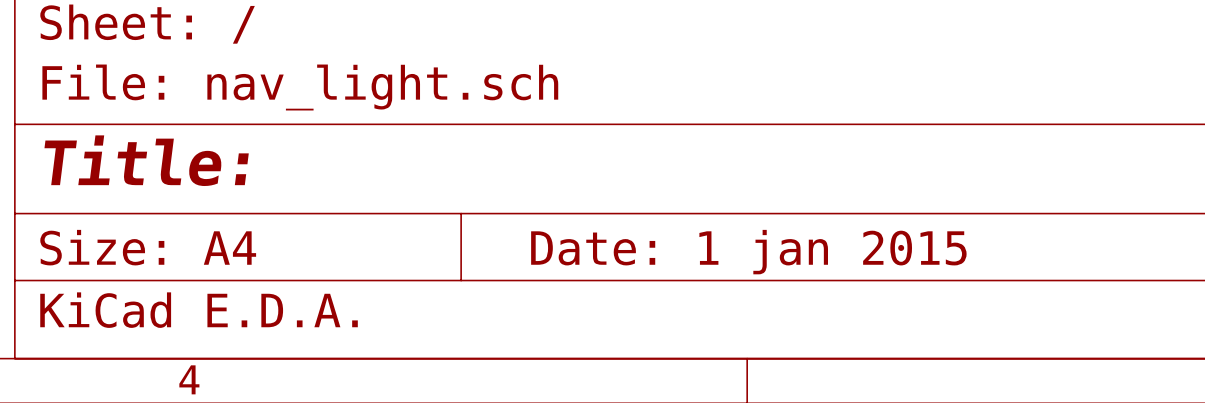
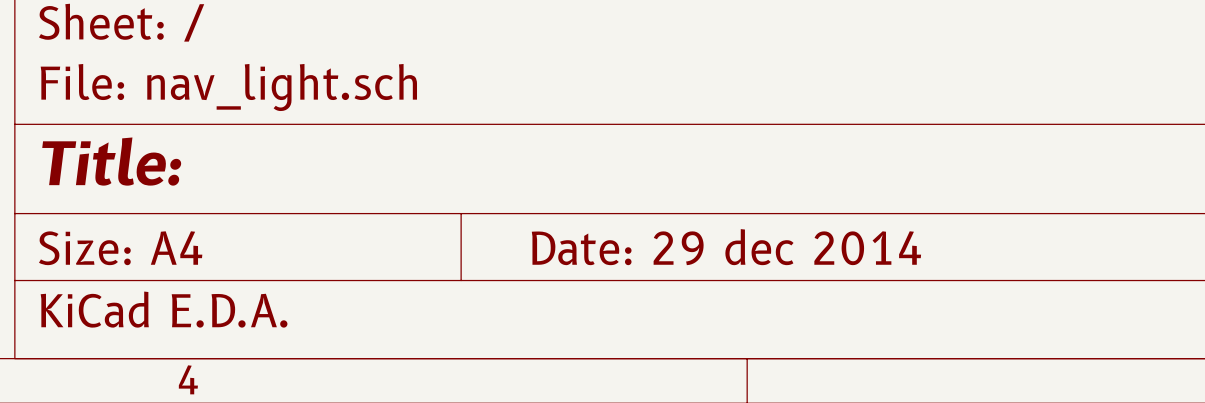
title block: Date: 1 jan 2015 (748, 252) -> Date: 29 dec 2014 (726, 247)

